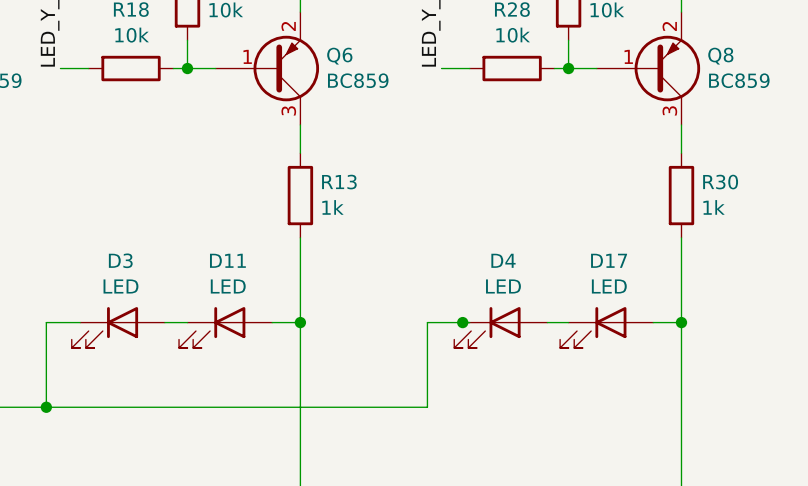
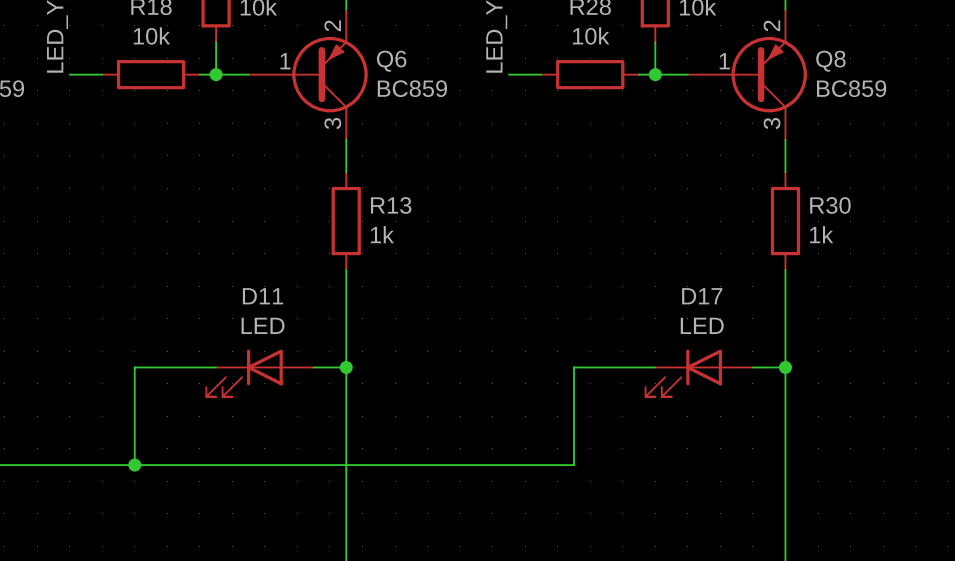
wire: (80, 322) (46, 322) (46, 407) -> none
wire: none -> (190, 367) (134, 367) (134, 465)
junction: (462, 322) -> none
wire: (469, 322) (427, 322) (427, 407) -> (630, 367) (573, 367) (573, 465) (492, 465)
D3: LED (118, 327) -> none
D4: LED (500, 327) -> none
junction: (46, 407) -> none
junction: none -> (134, 465)

